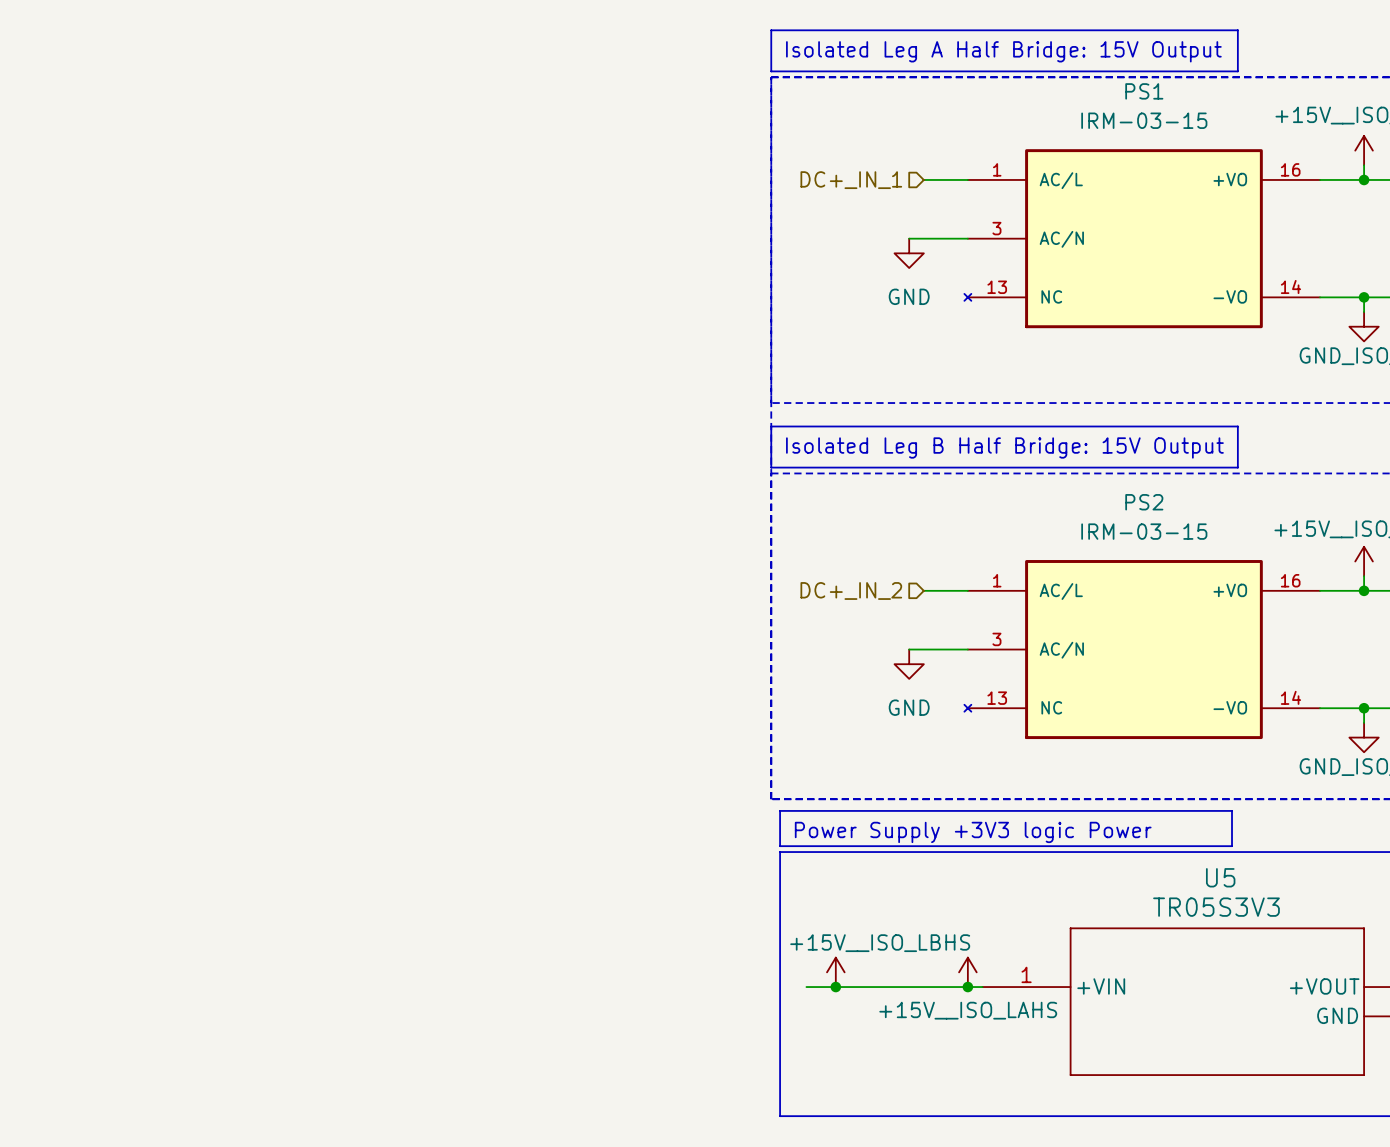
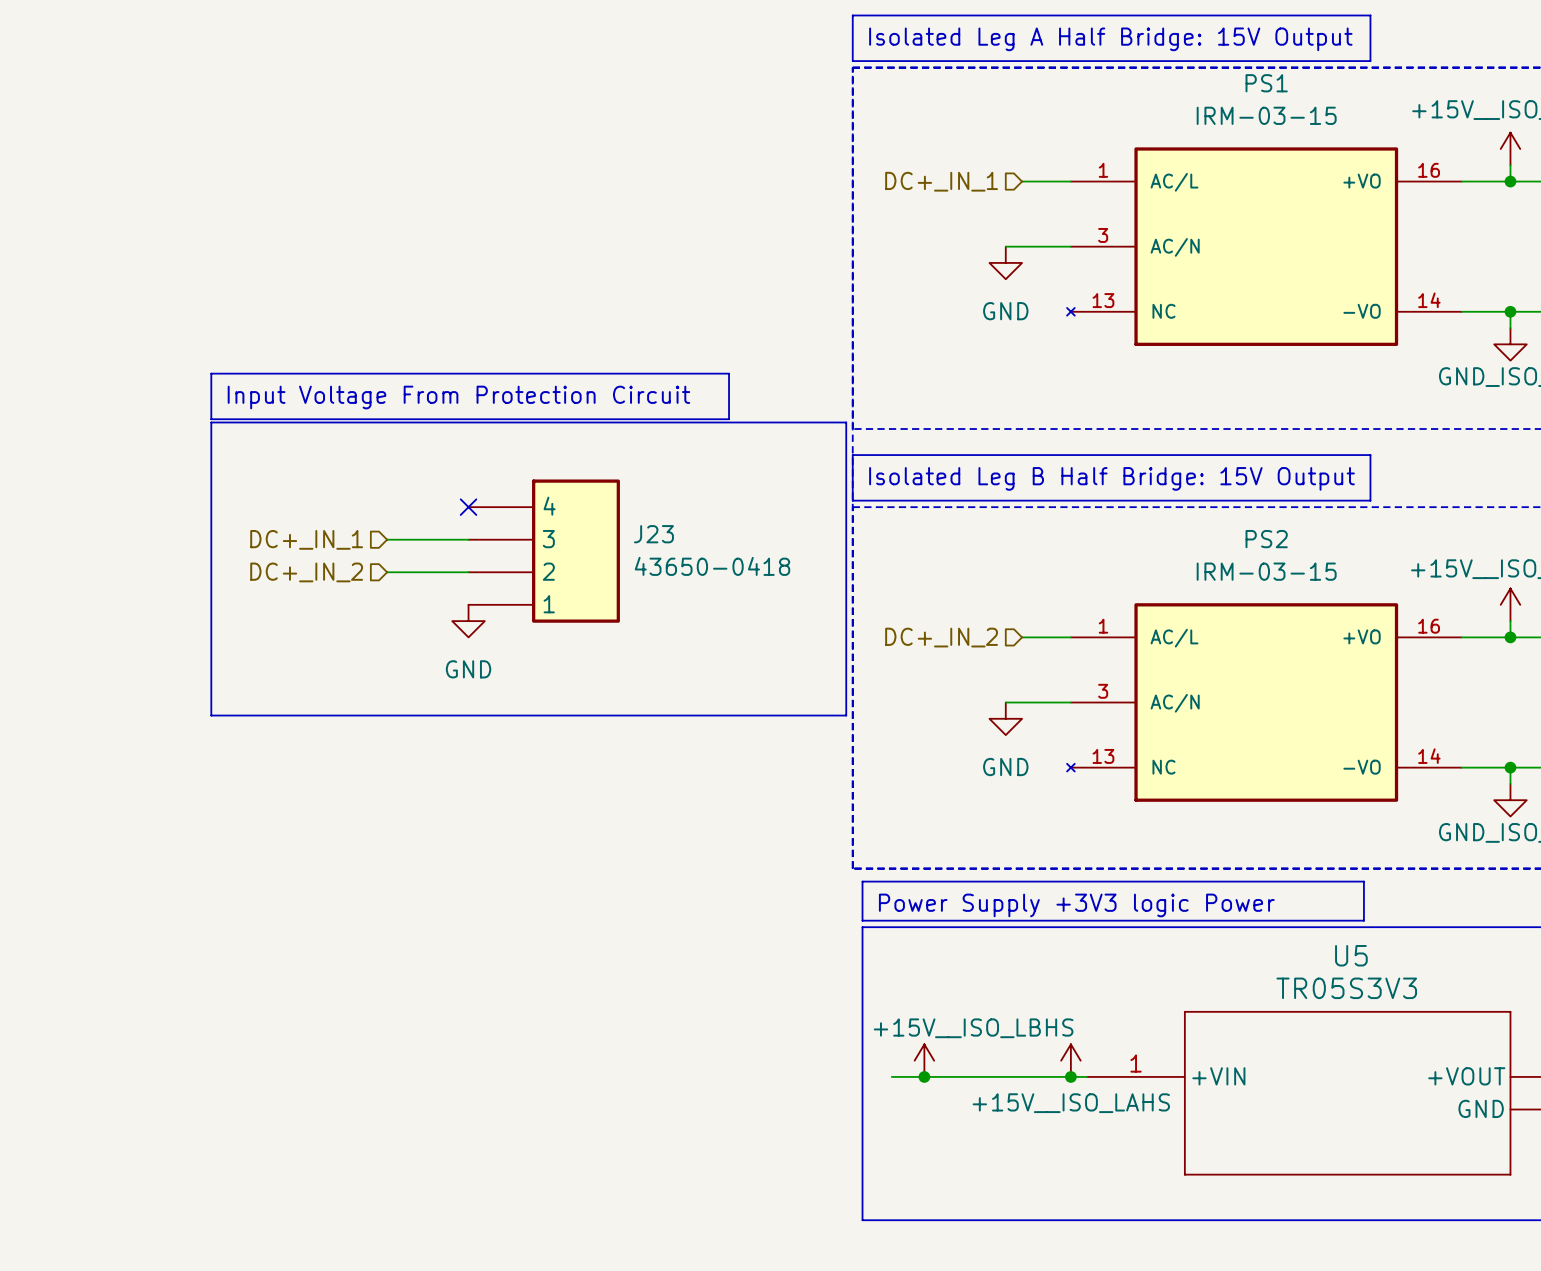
line: none -> (211, 373) (211, 419) (729, 419) (729, 373) (211, 373)
text: none -> Input Voltage From Protection Circuit (458, 397)
line: none -> (211, 422) (846, 422) (846, 715) (211, 715) (211, 422)
no-connect mark: none -> (468, 507)
hierarchical label: none -> DC+_IN_1 (306, 539)
wire: none -> (387, 539) (468, 539)
J23: none -> 43650-0418 (544, 551)
hierarchical label: none -> DC+_IN_2 (306, 572)
wire: none -> (387, 572) (468, 572)
power symbol: none -> GND (468, 621)

